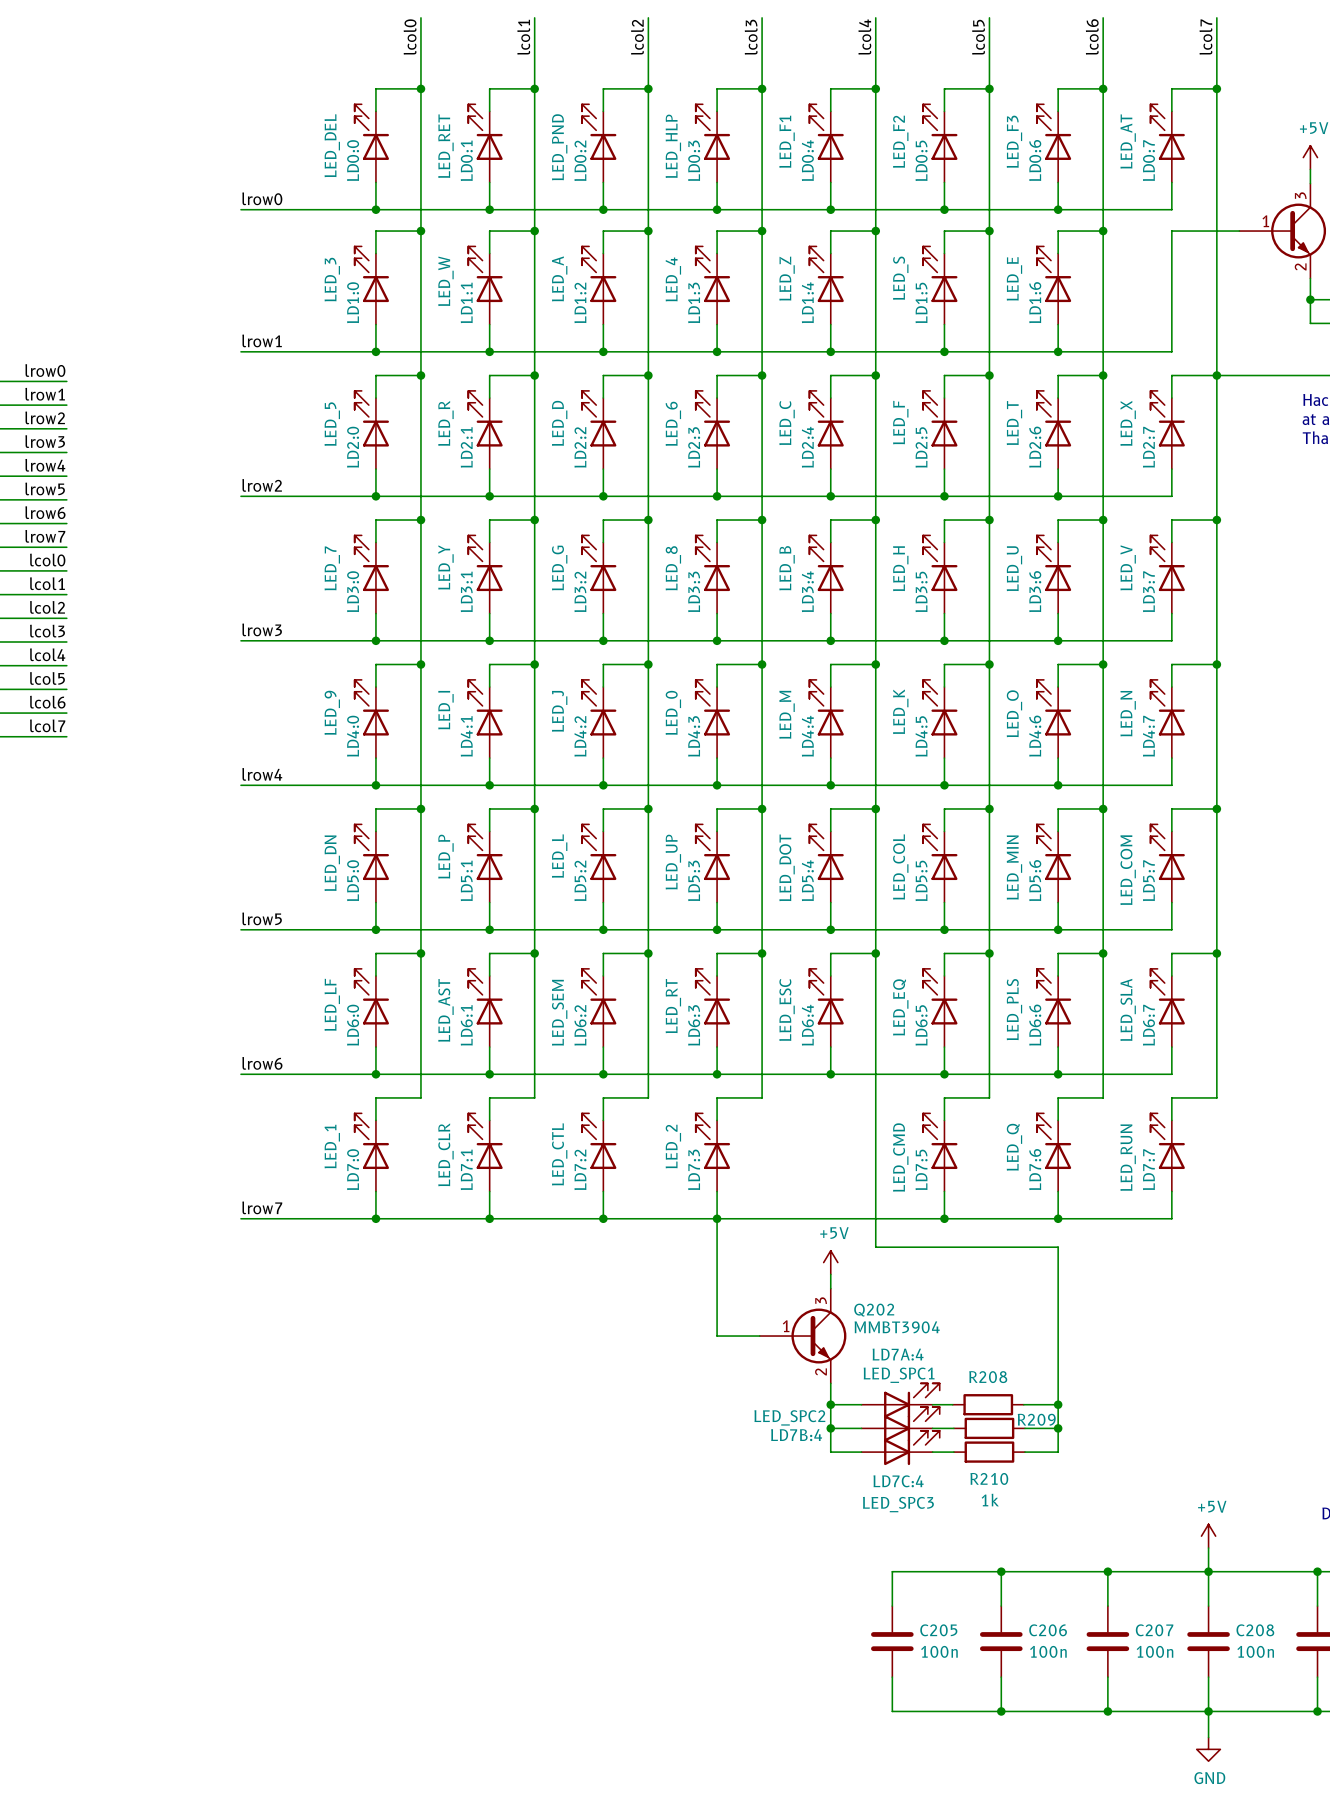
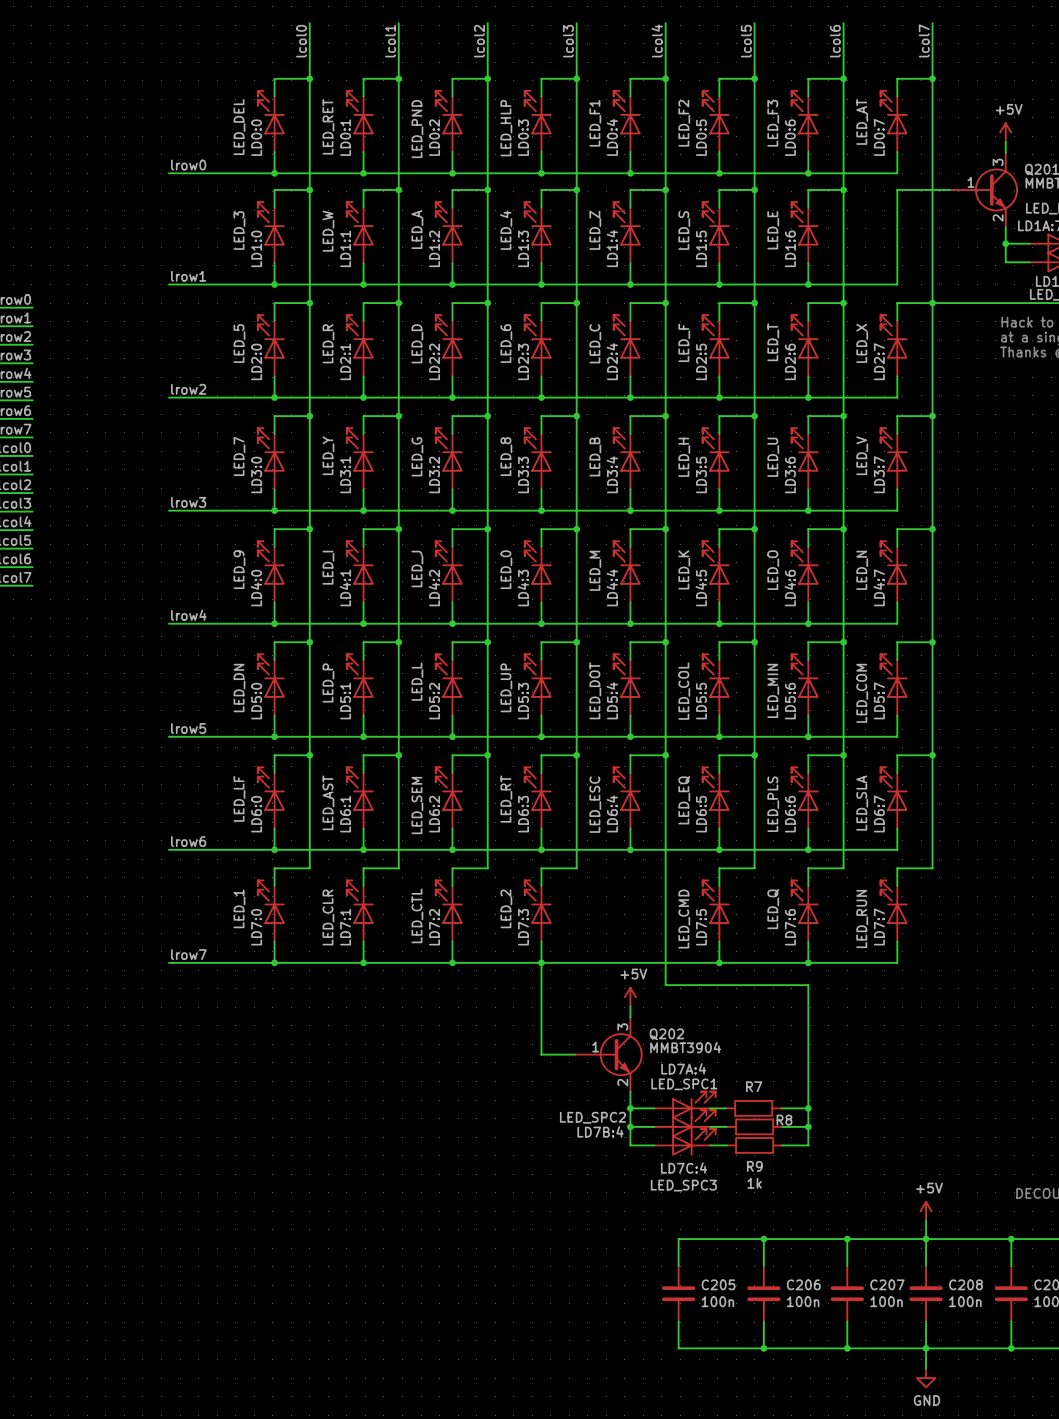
R208 name: R208 (988, 1377) -> R7 (754, 1086)
R209 name: R209 (1036, 1419) -> R8 (784, 1120)
R210 name: R210 (989, 1478) -> R9 (754, 1166)

